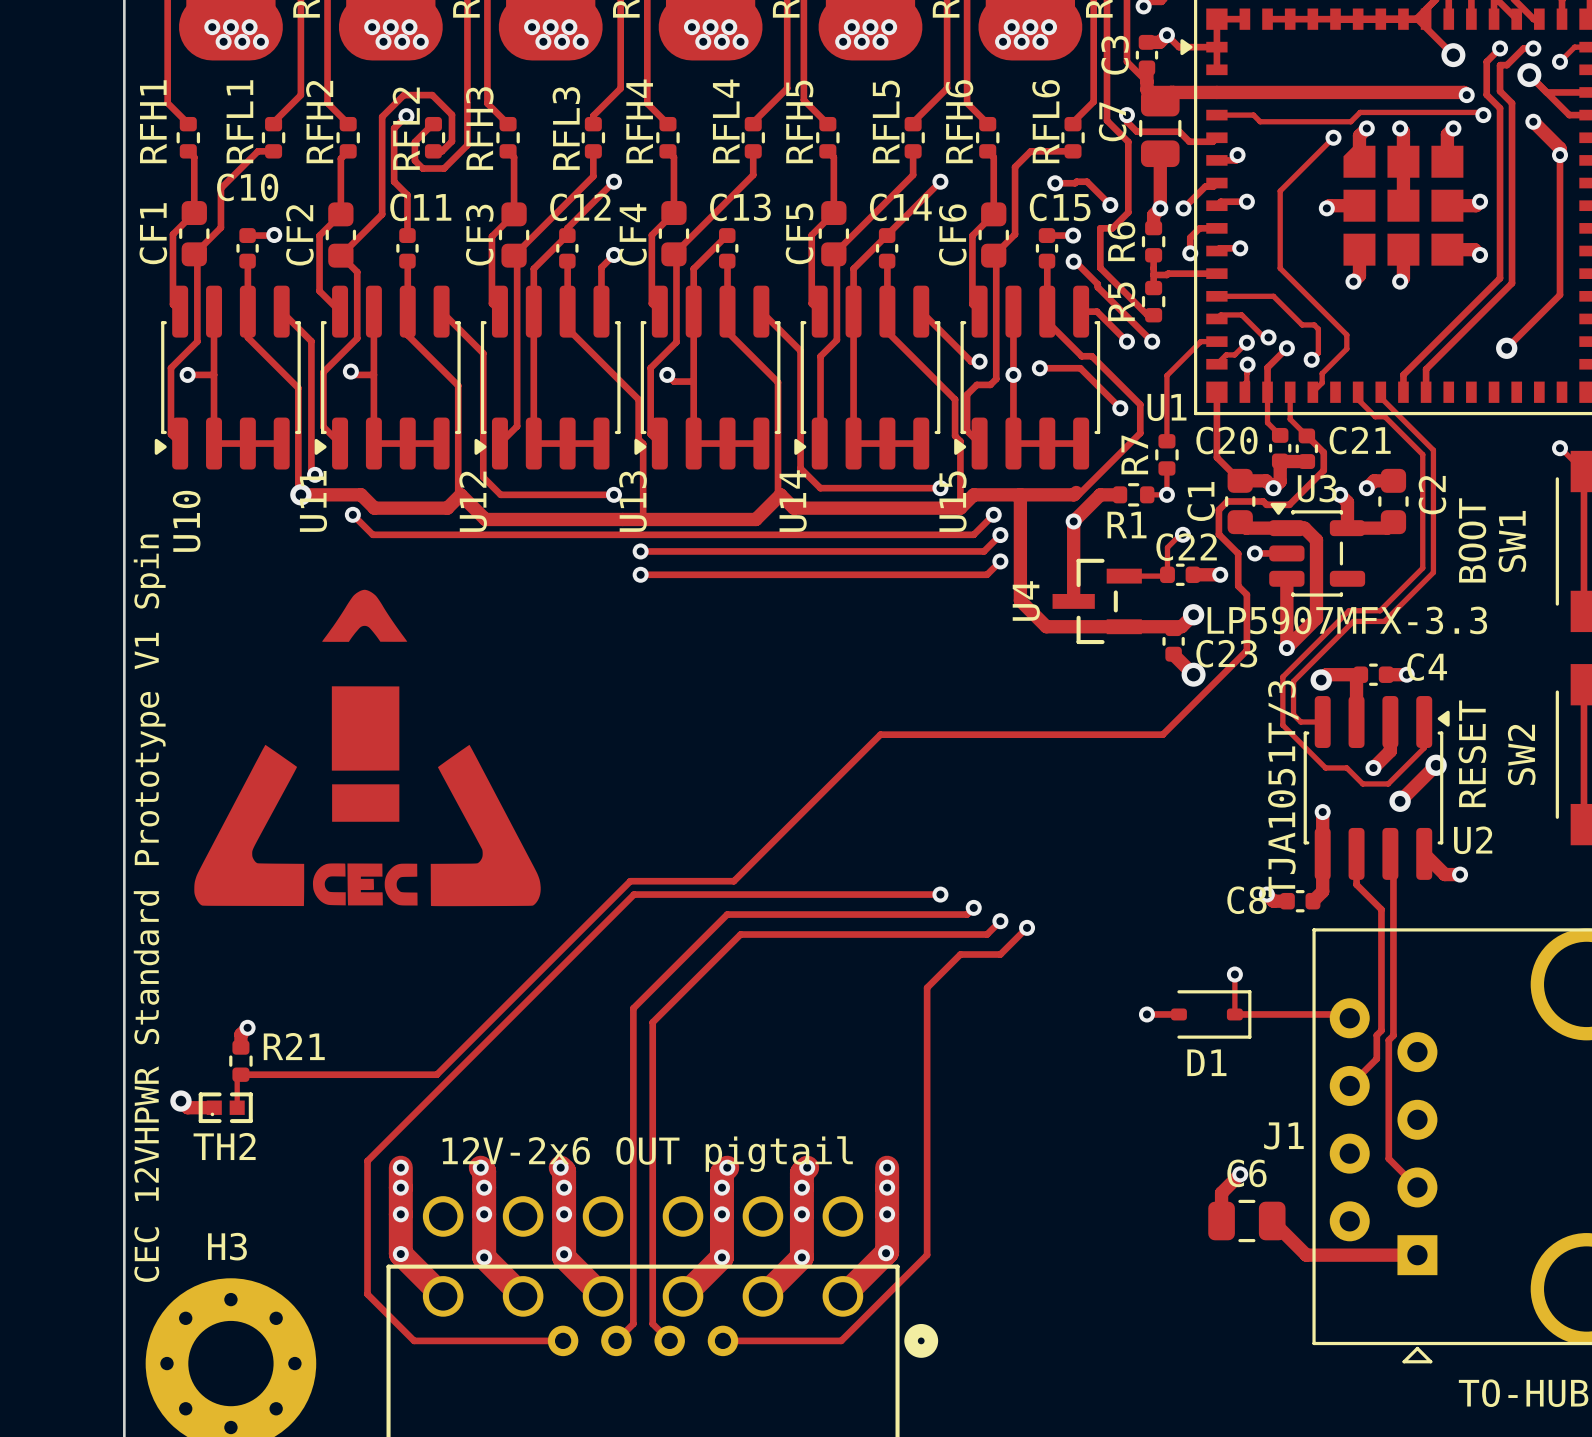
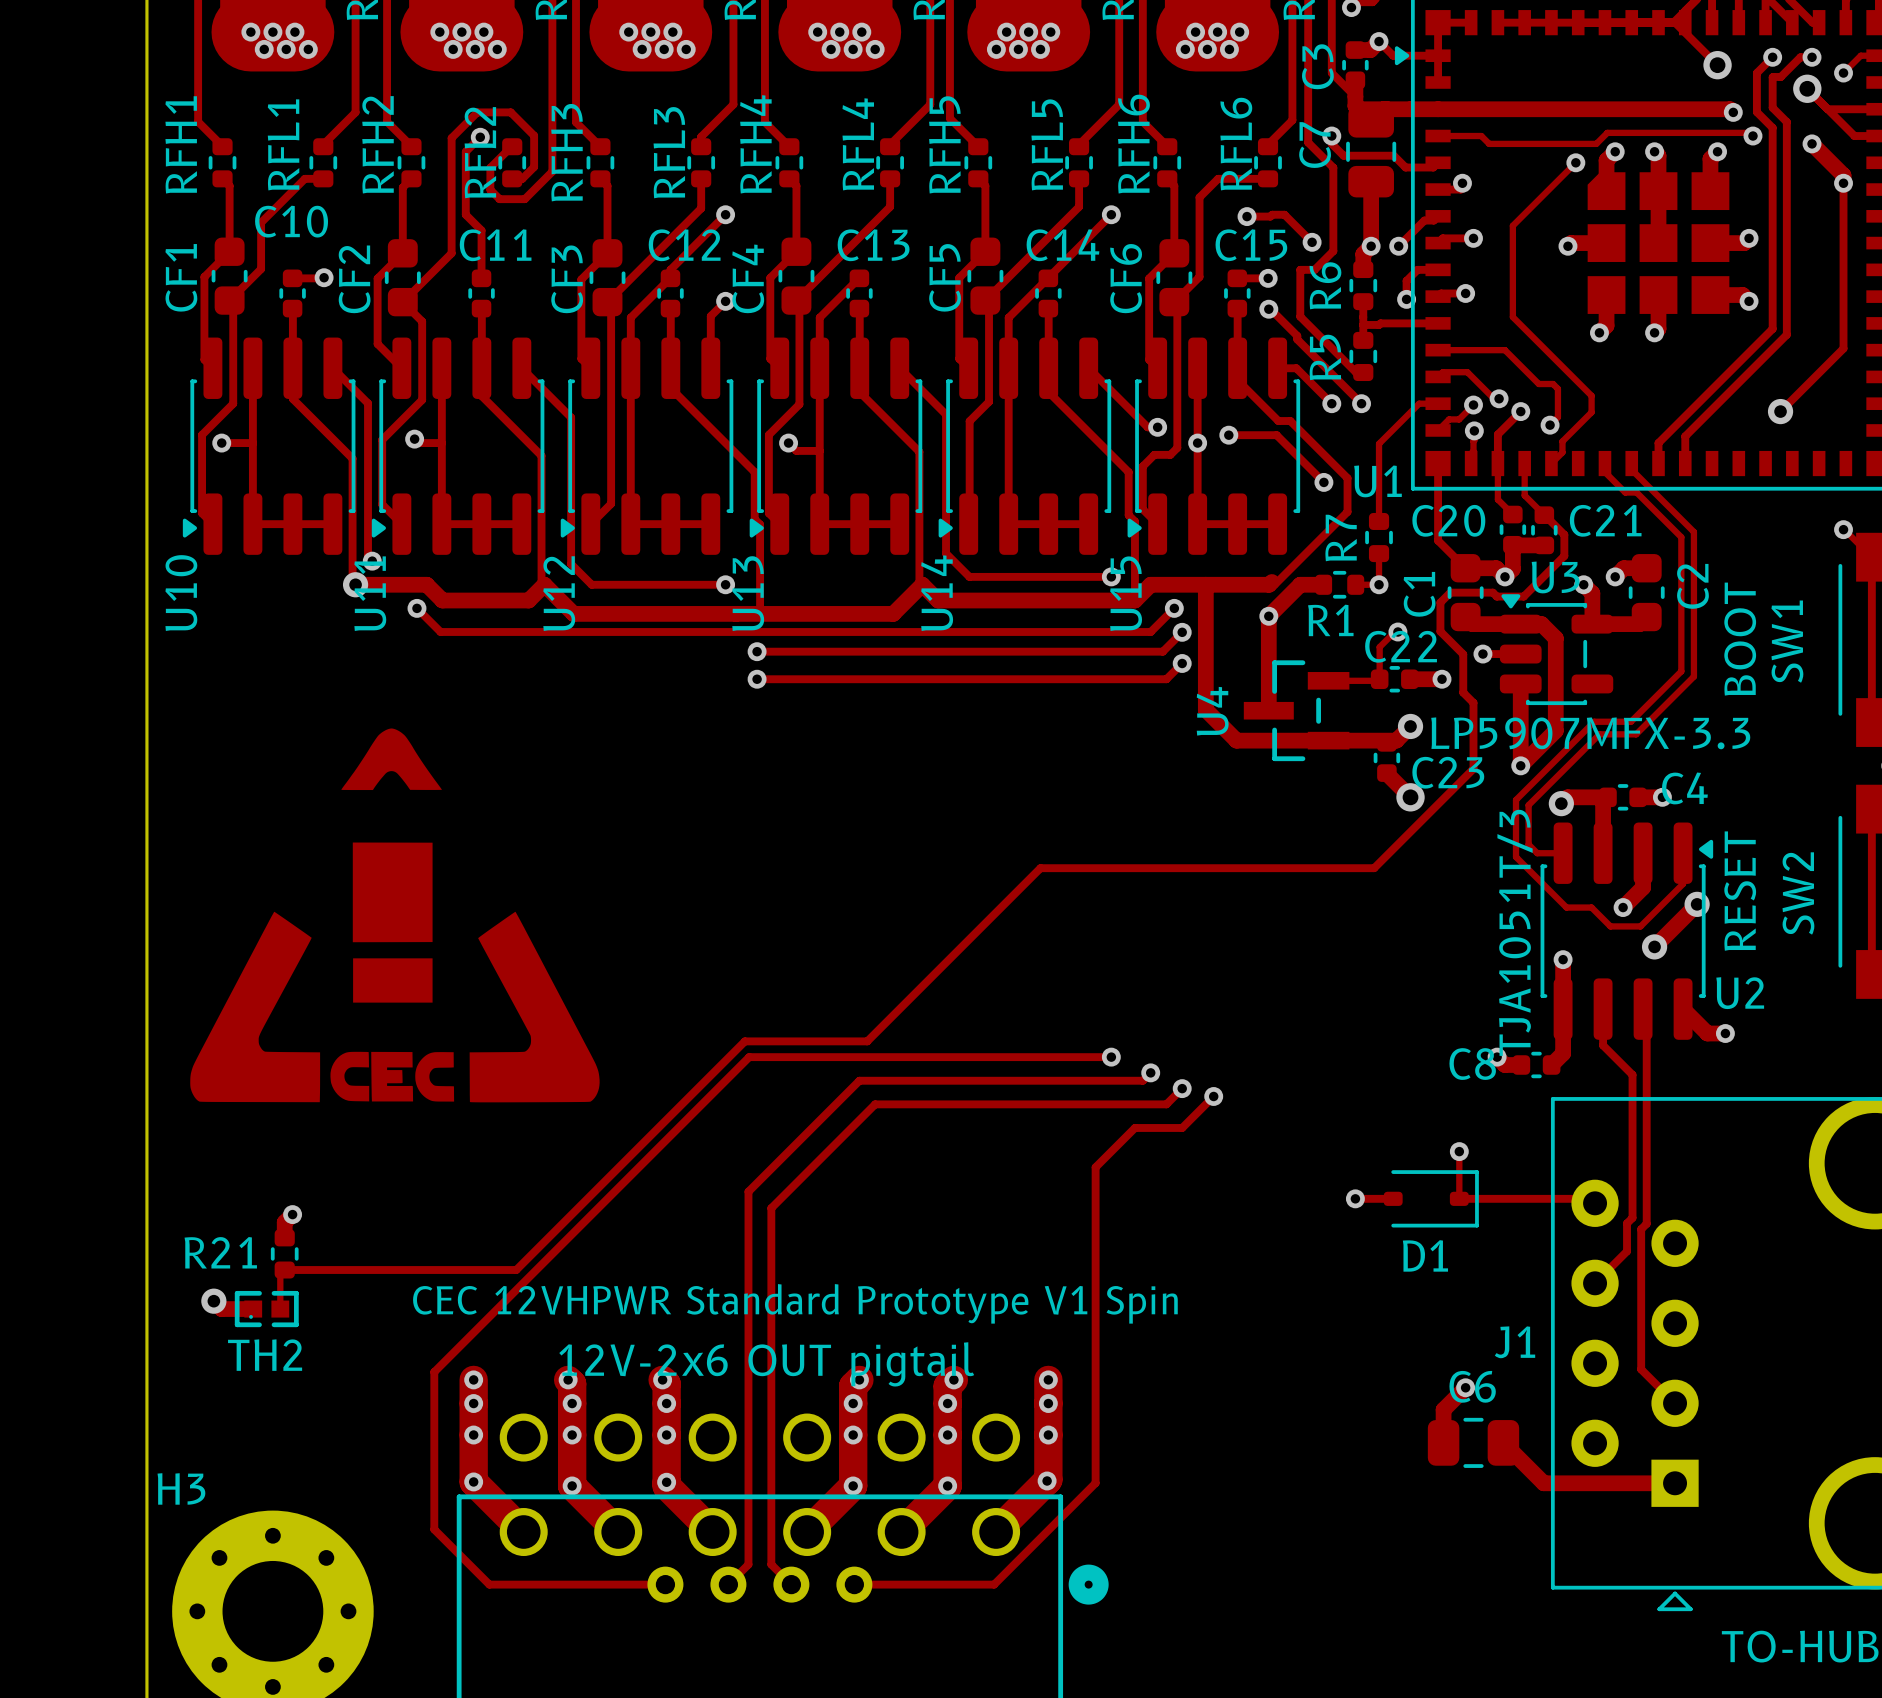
U10 name position: U10 (186, 521) -> U10 (181, 593)
drawing position: (367, 747) -> (394, 915)
text rotation: 0° (149, 908) -> 90° clockwise (795, 1303)
R21 name position: R21 (294, 1046) -> R21 (220, 1252)
H3 name position: H3 (227, 1246) -> H3 (181, 1488)

